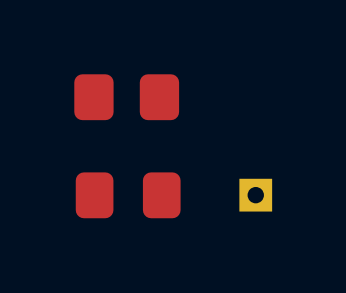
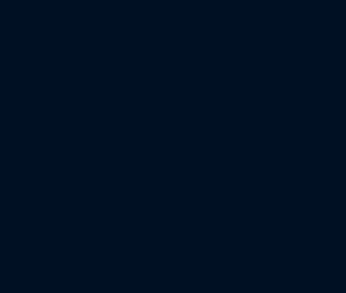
part: (126, 97) -> none
part: (128, 195) -> none
part: (255, 195) -> none

